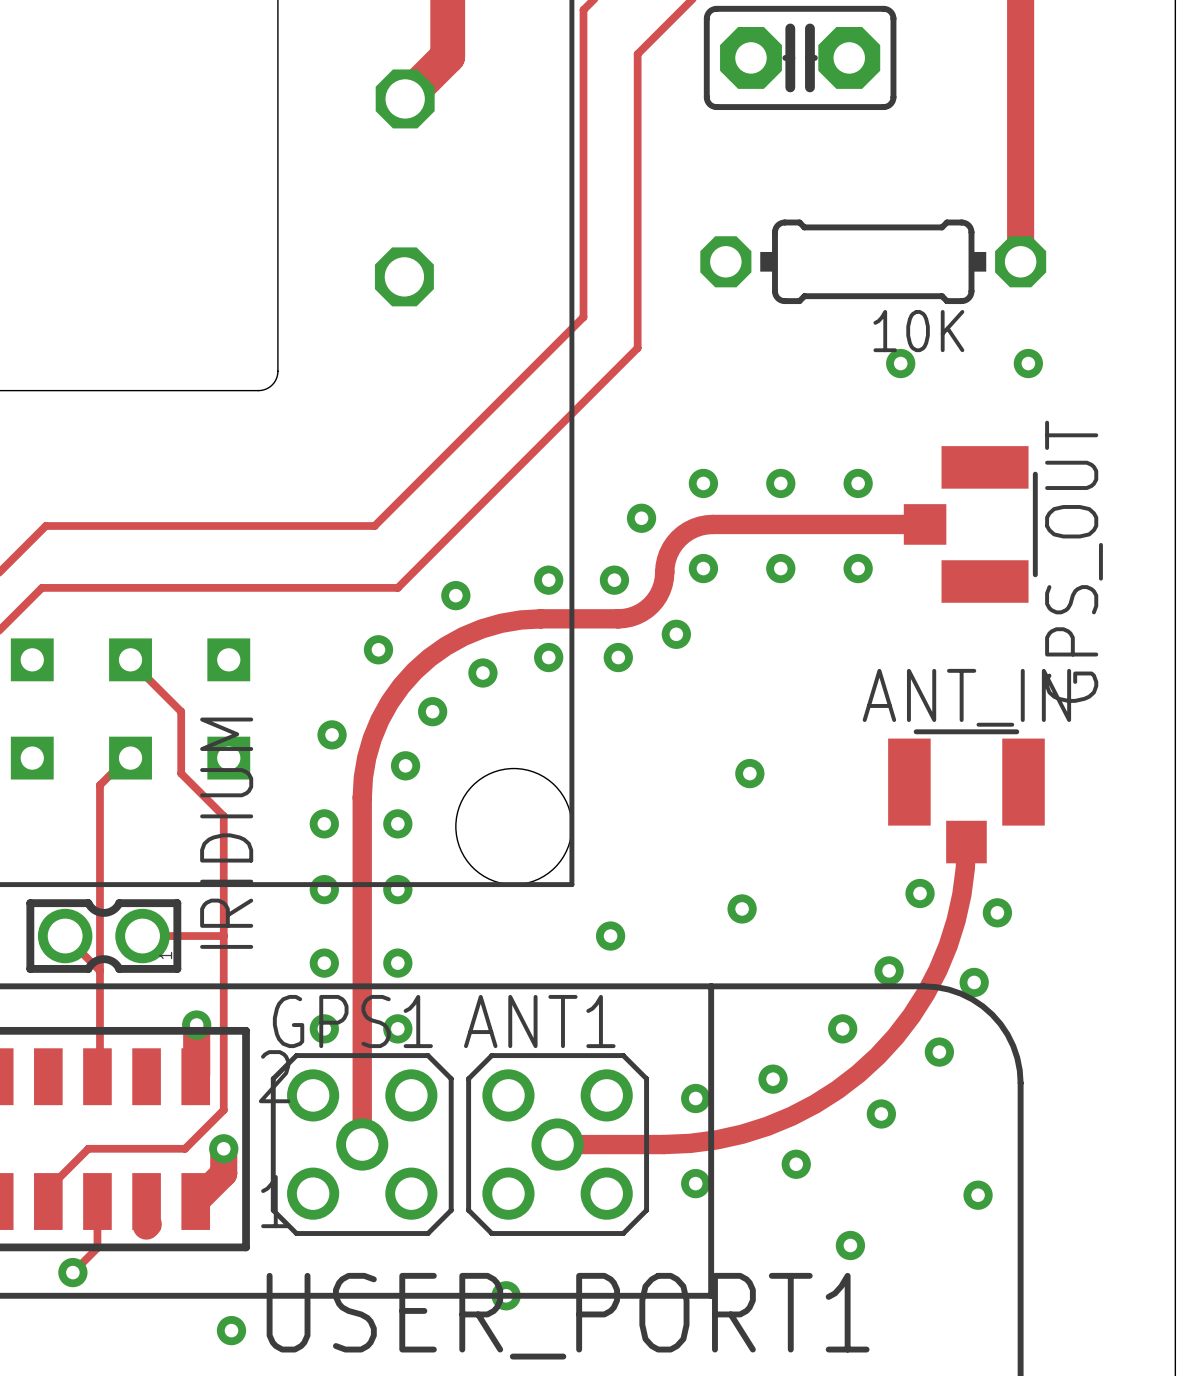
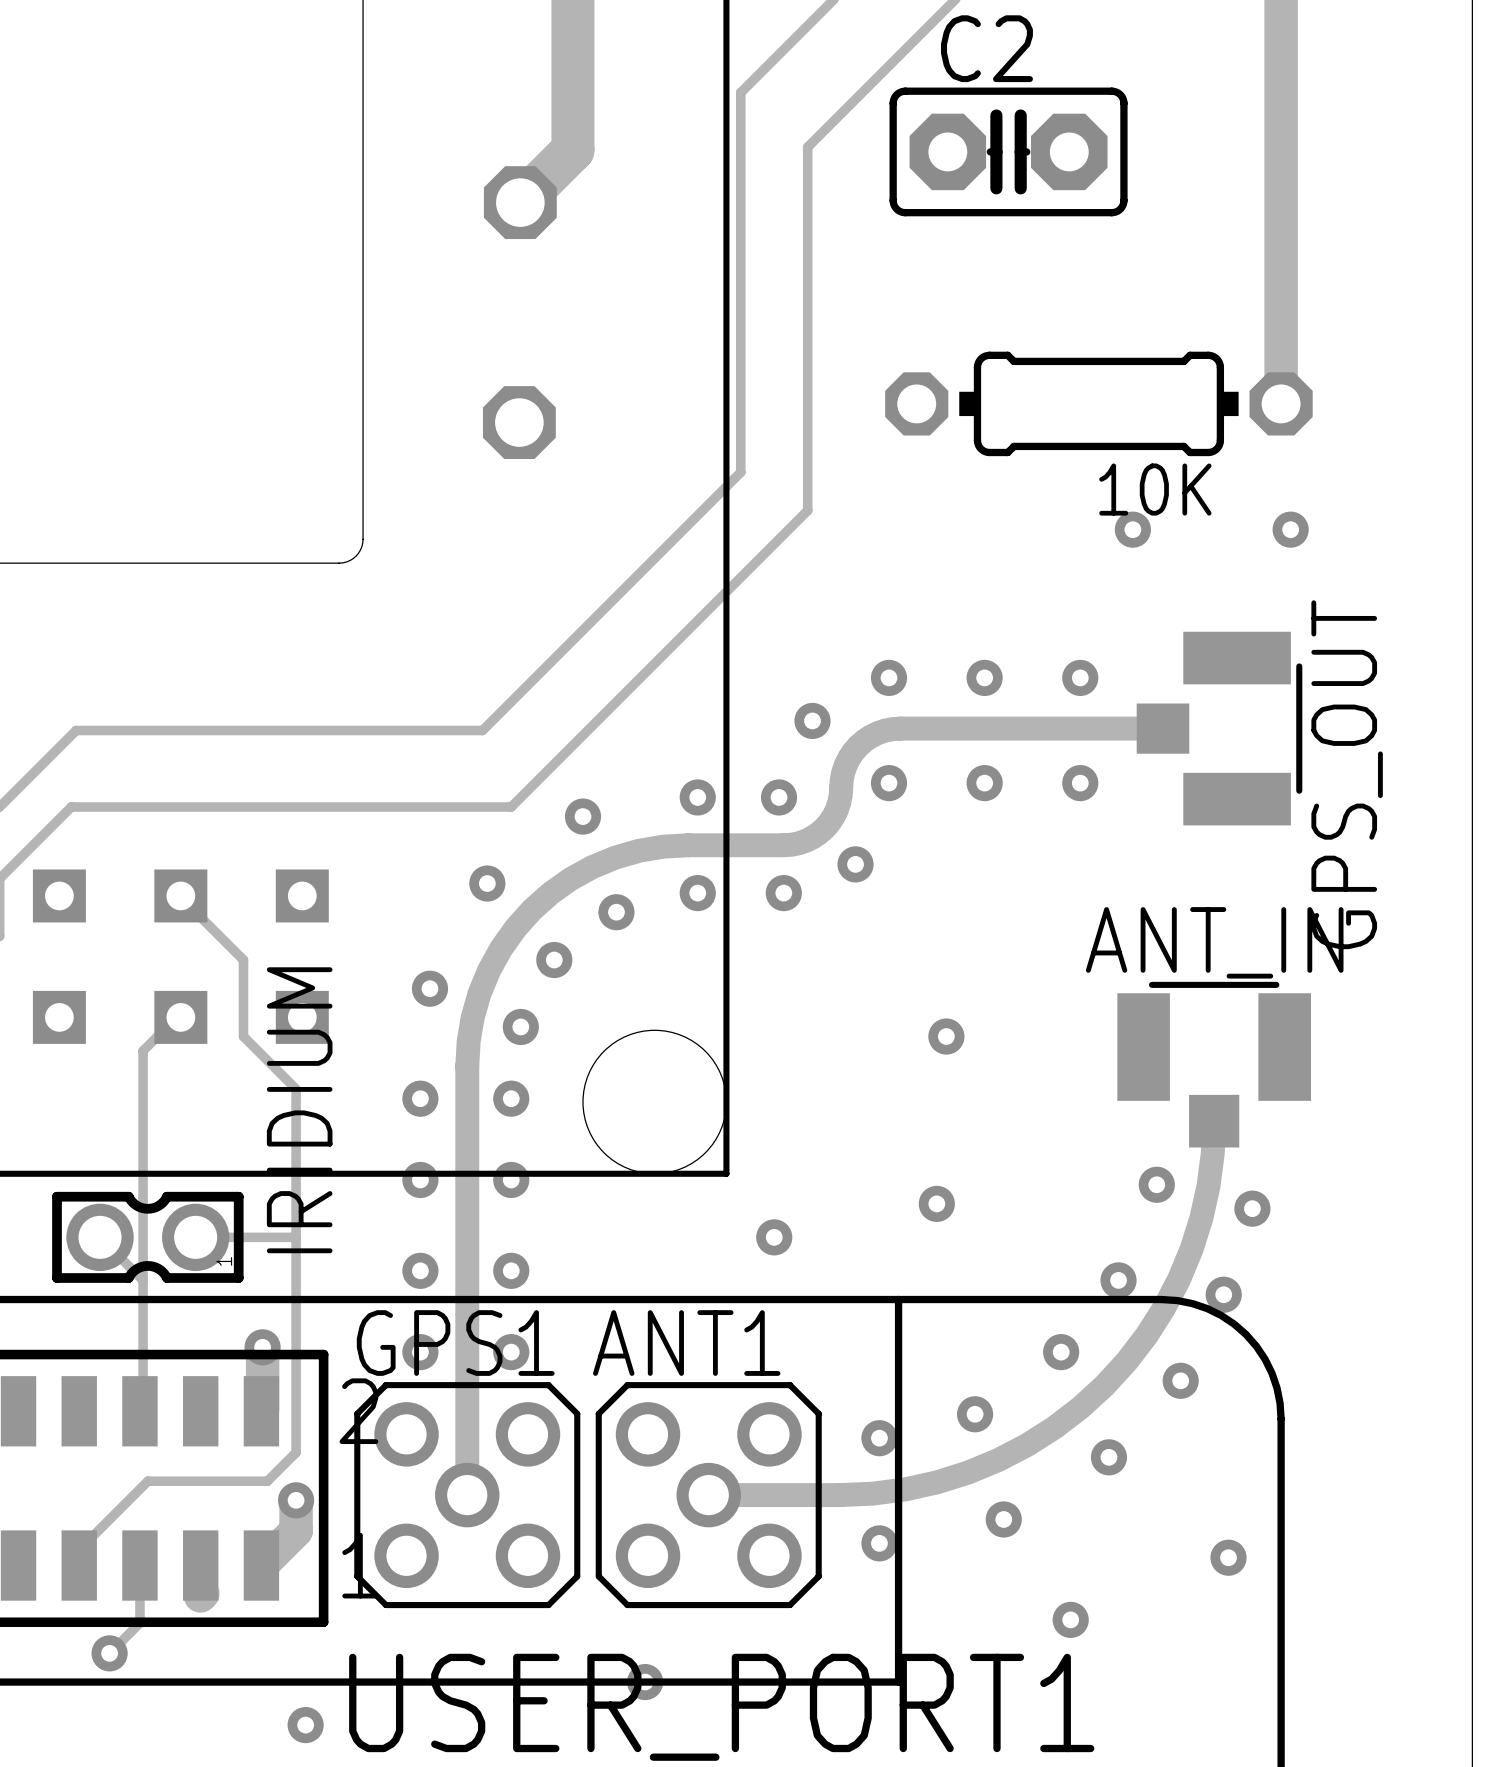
track: (200, 1133) (185, 1148) (88, 1148) -> (267, 1481) (147, 1481) (128, 1500)

